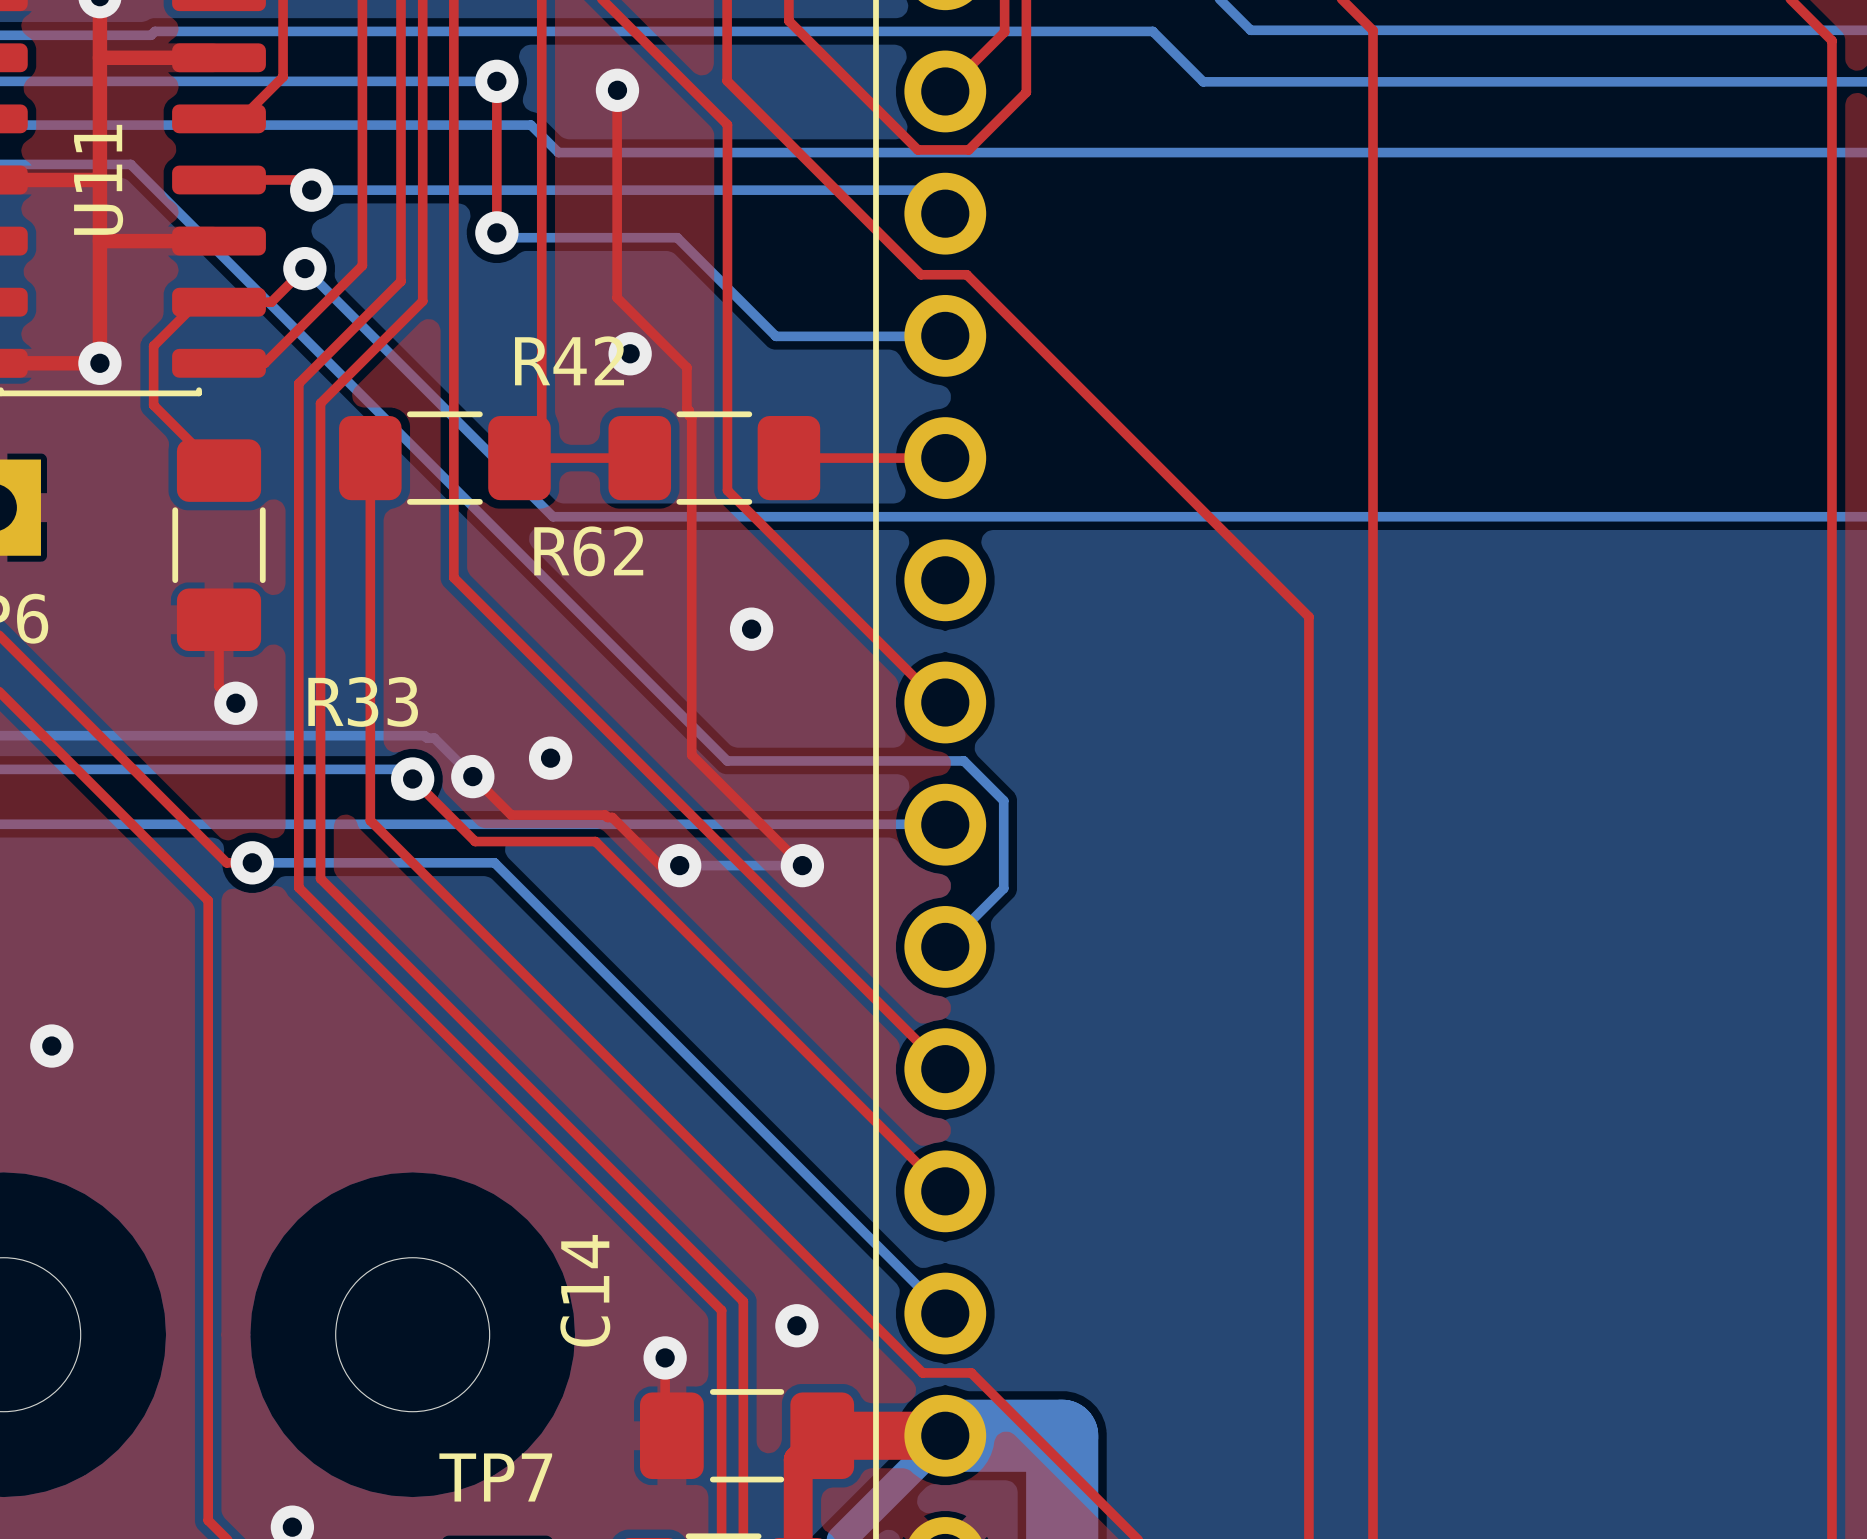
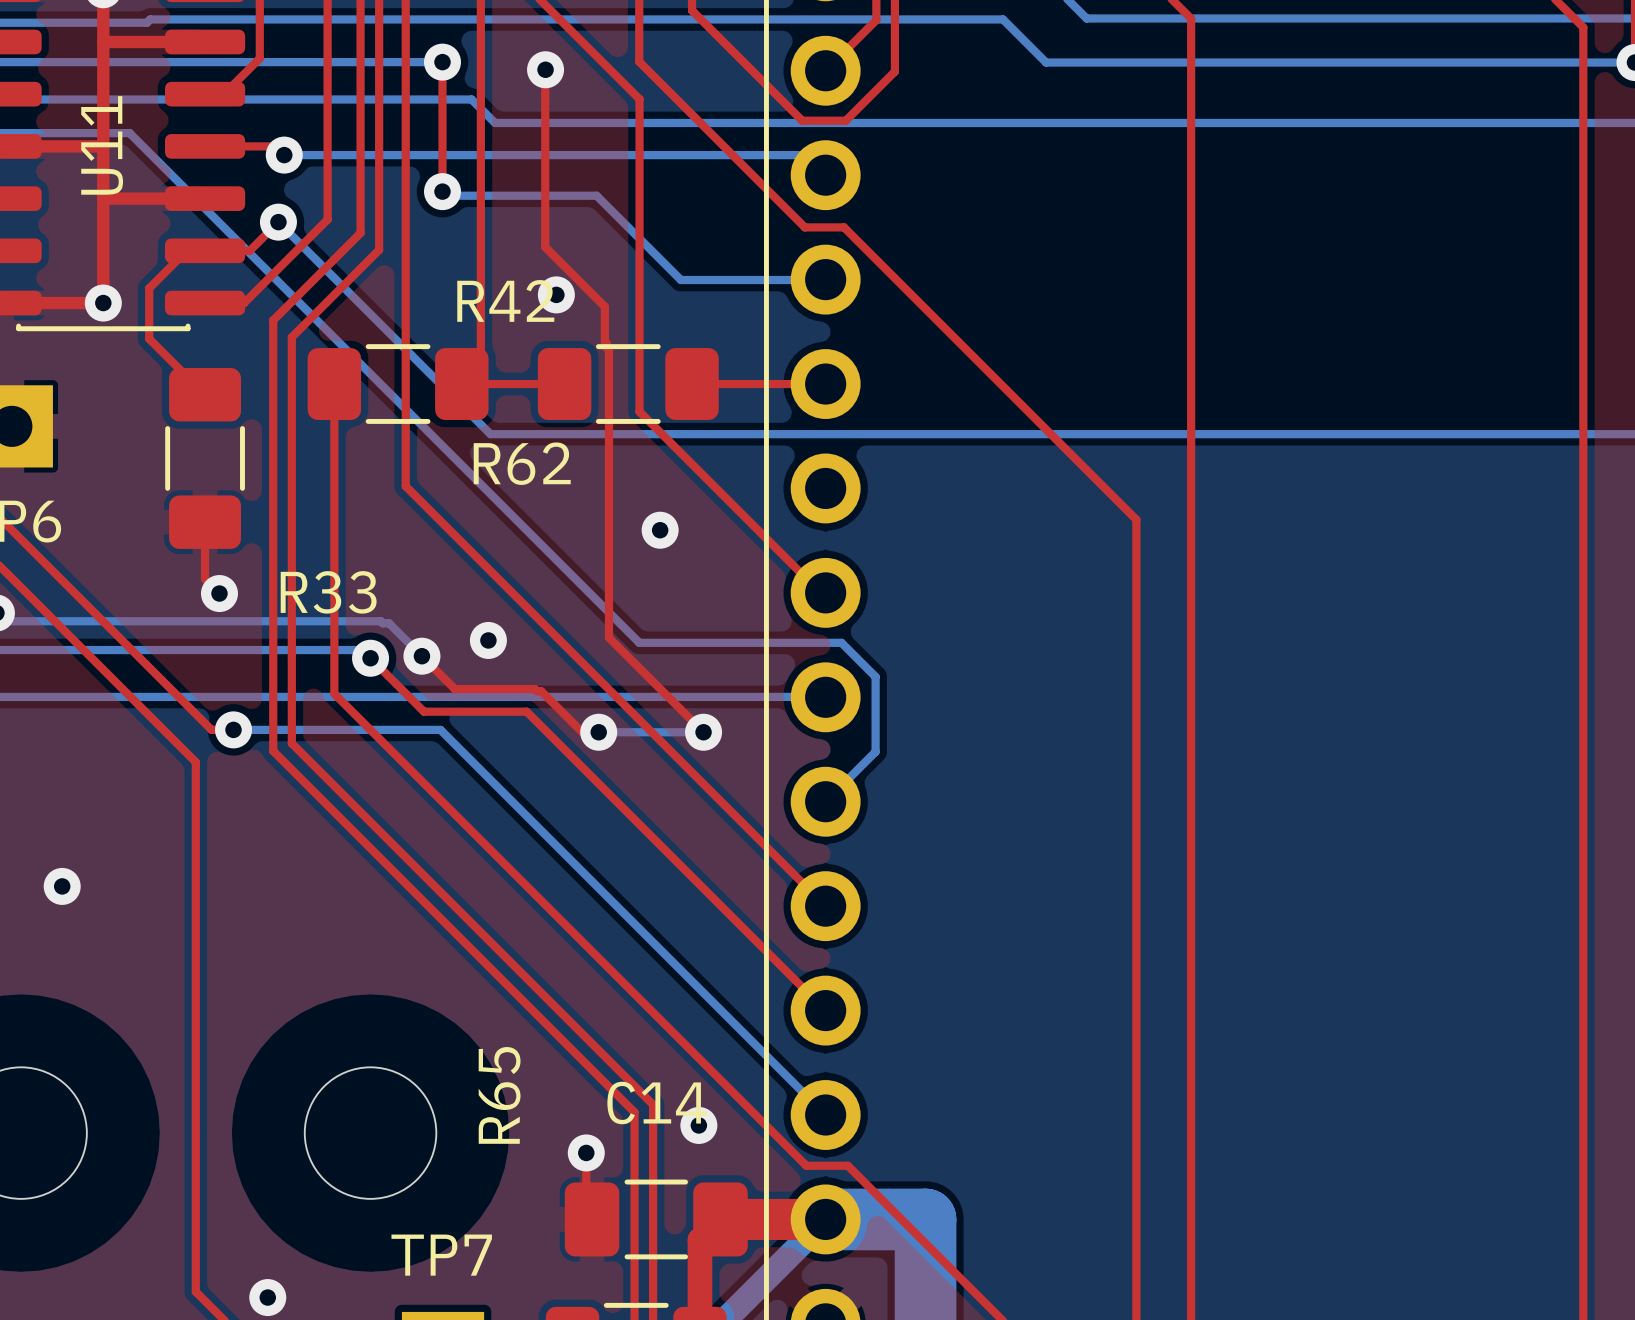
C14 name rotation: 0° (585, 1290) -> 90° clockwise (657, 1102)
R65 name: none -> R65 (499, 1095)

